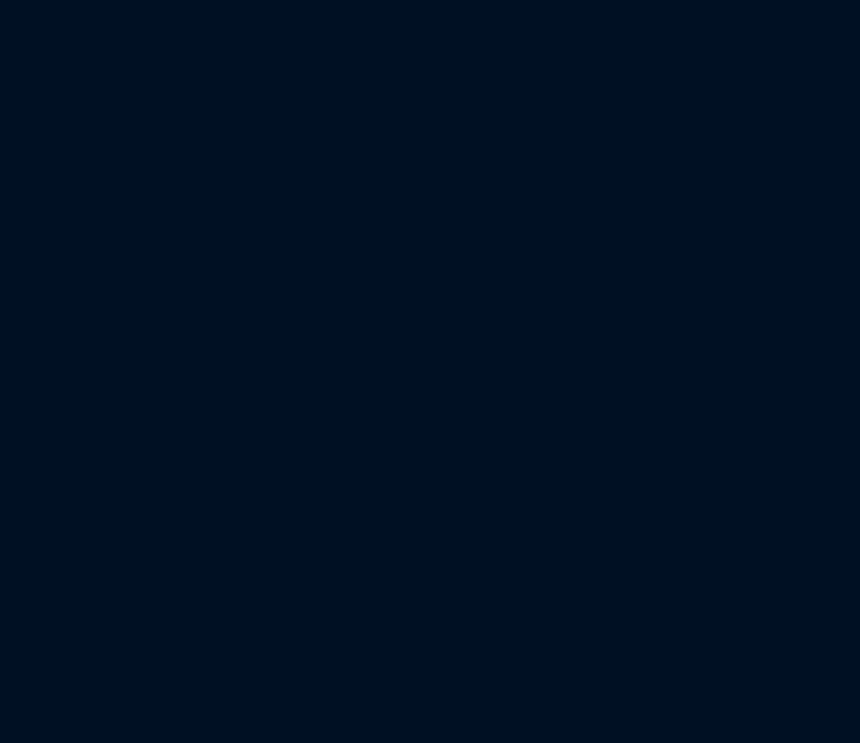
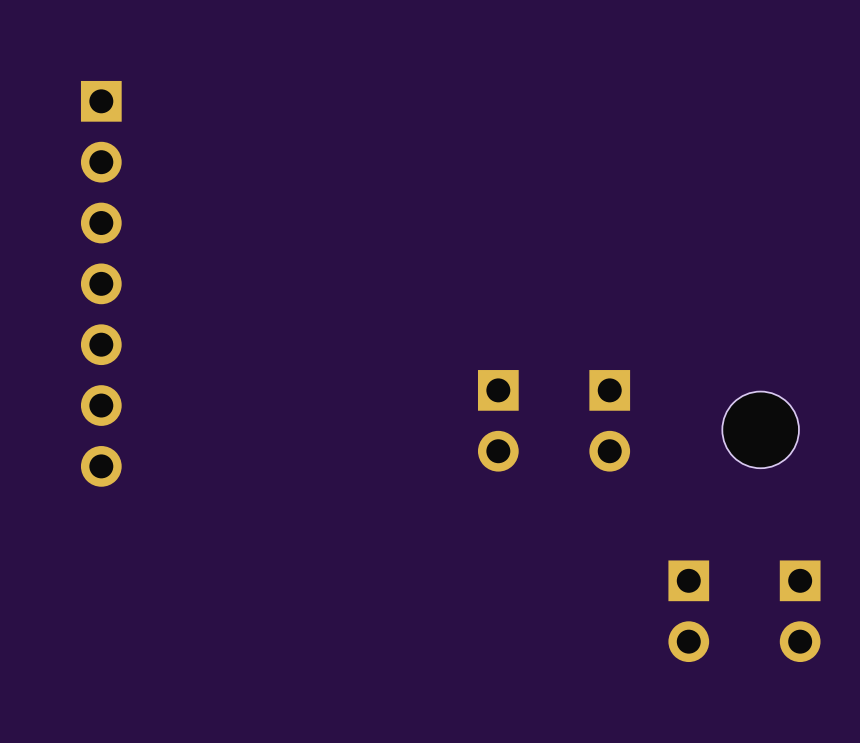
part: none -> (101, 283)
part: none -> (498, 420)
part: none -> (609, 420)
part: none -> (760, 429)
part: none -> (688, 611)
part: none -> (800, 611)

